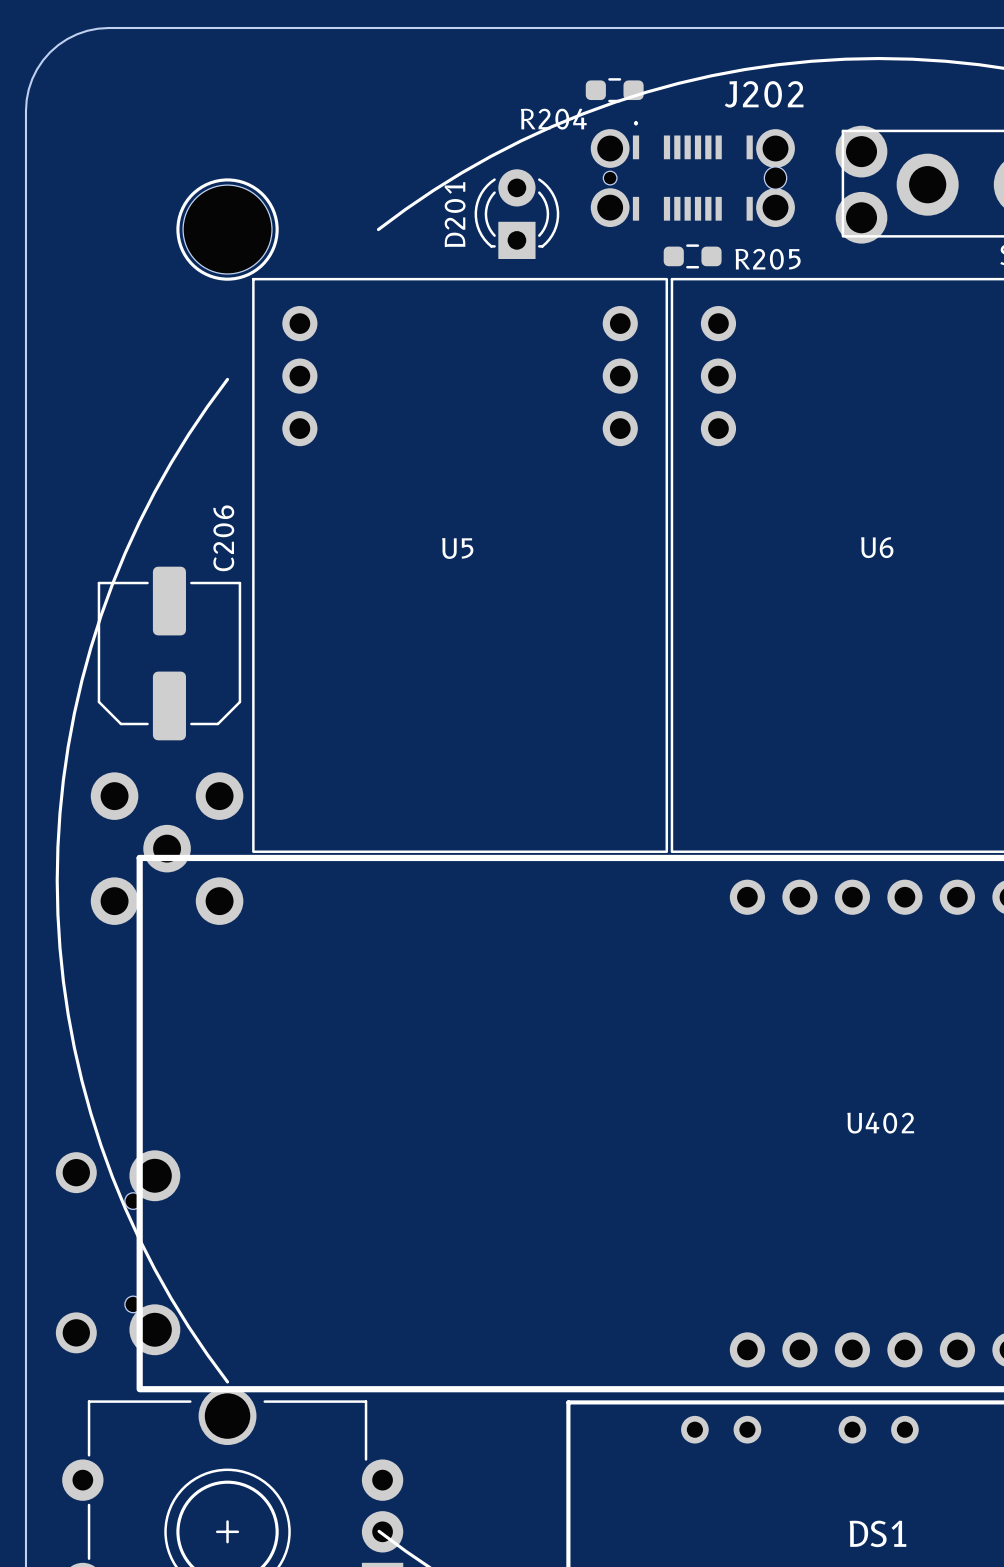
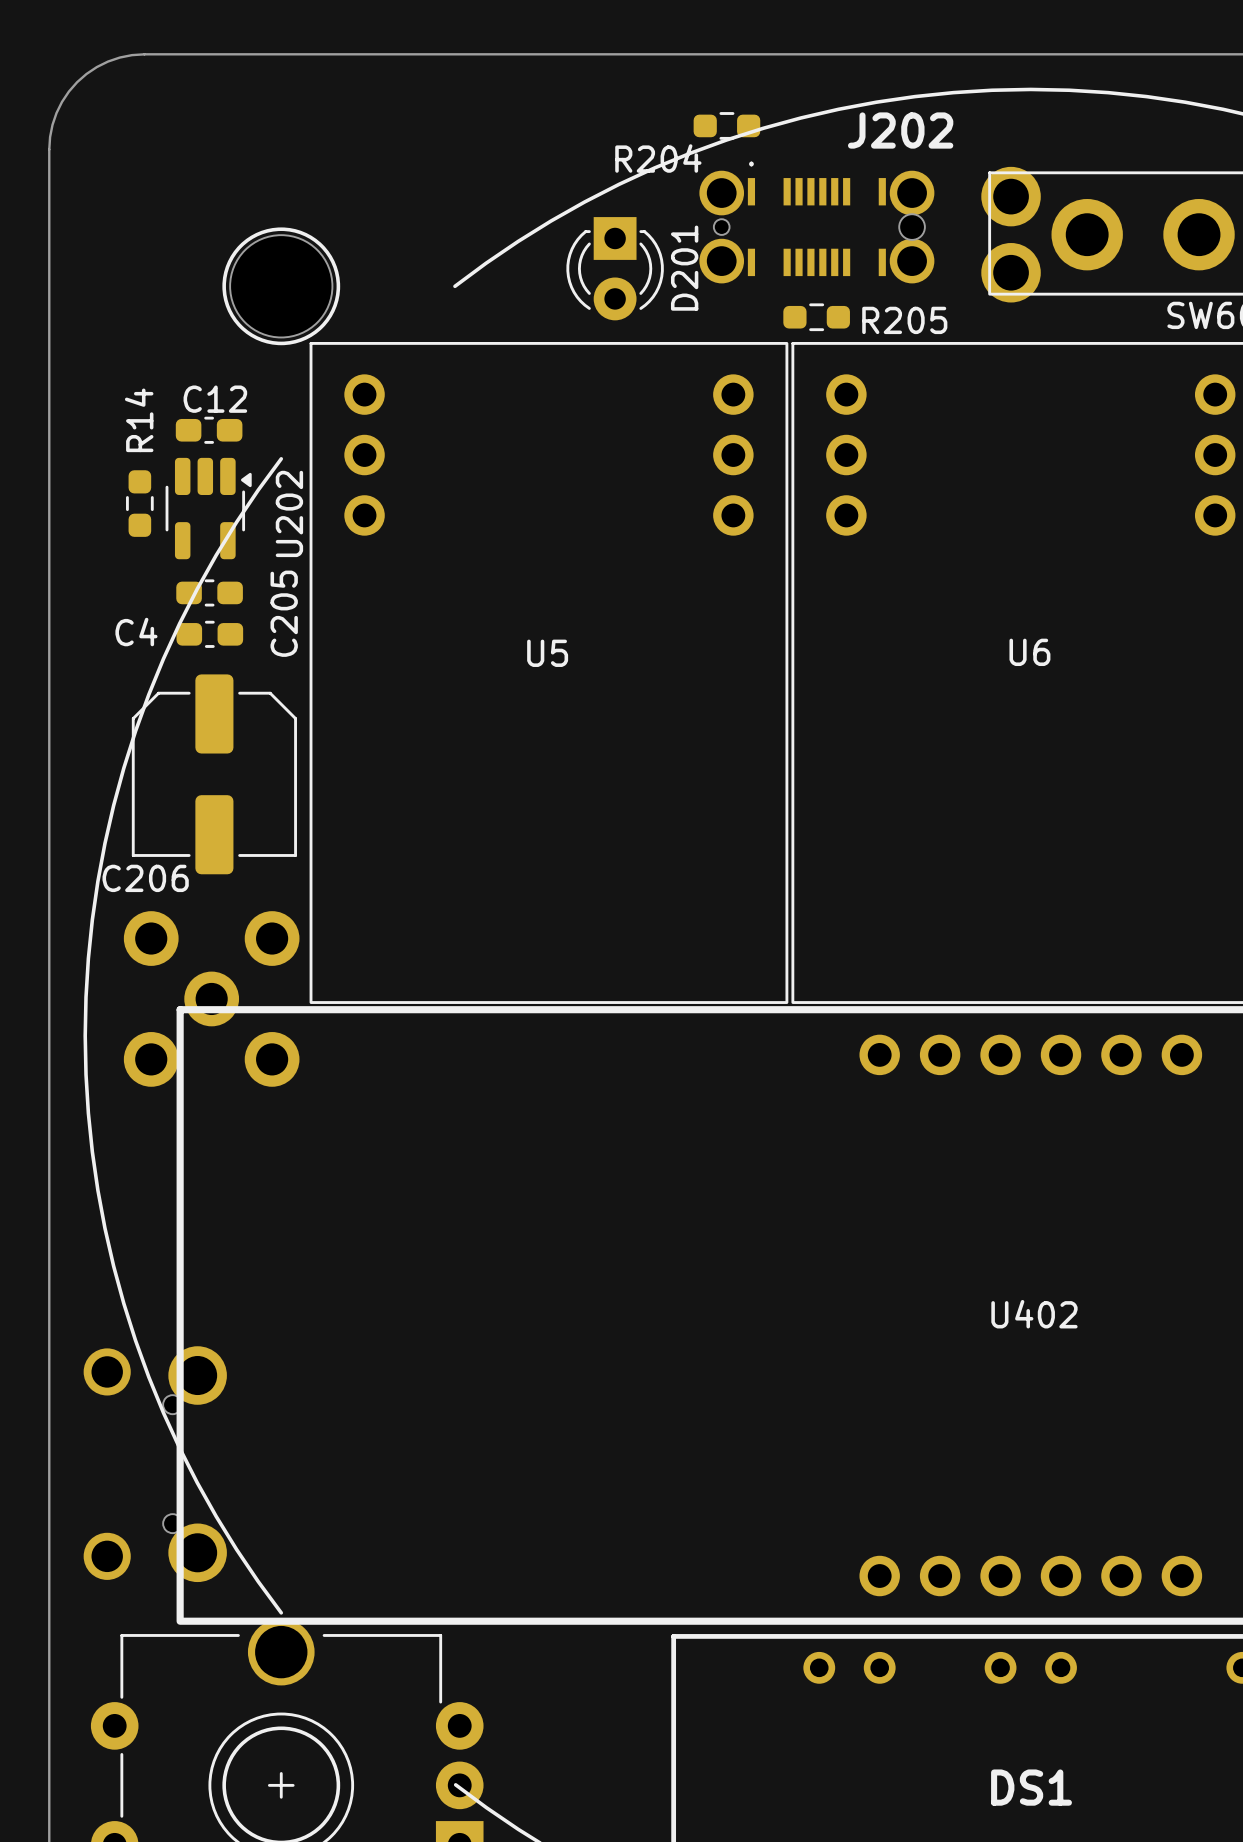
D201 rotation: 0° (516, 214) -> 180° (615, 268)
C12: none -> (209, 430)
R14: none -> (139, 503)
U202: none -> (208, 508)
C205: none -> (209, 592)
C4: none -> (209, 634)
C206 rotation: 0° (169, 653) -> 180° (214, 774)

